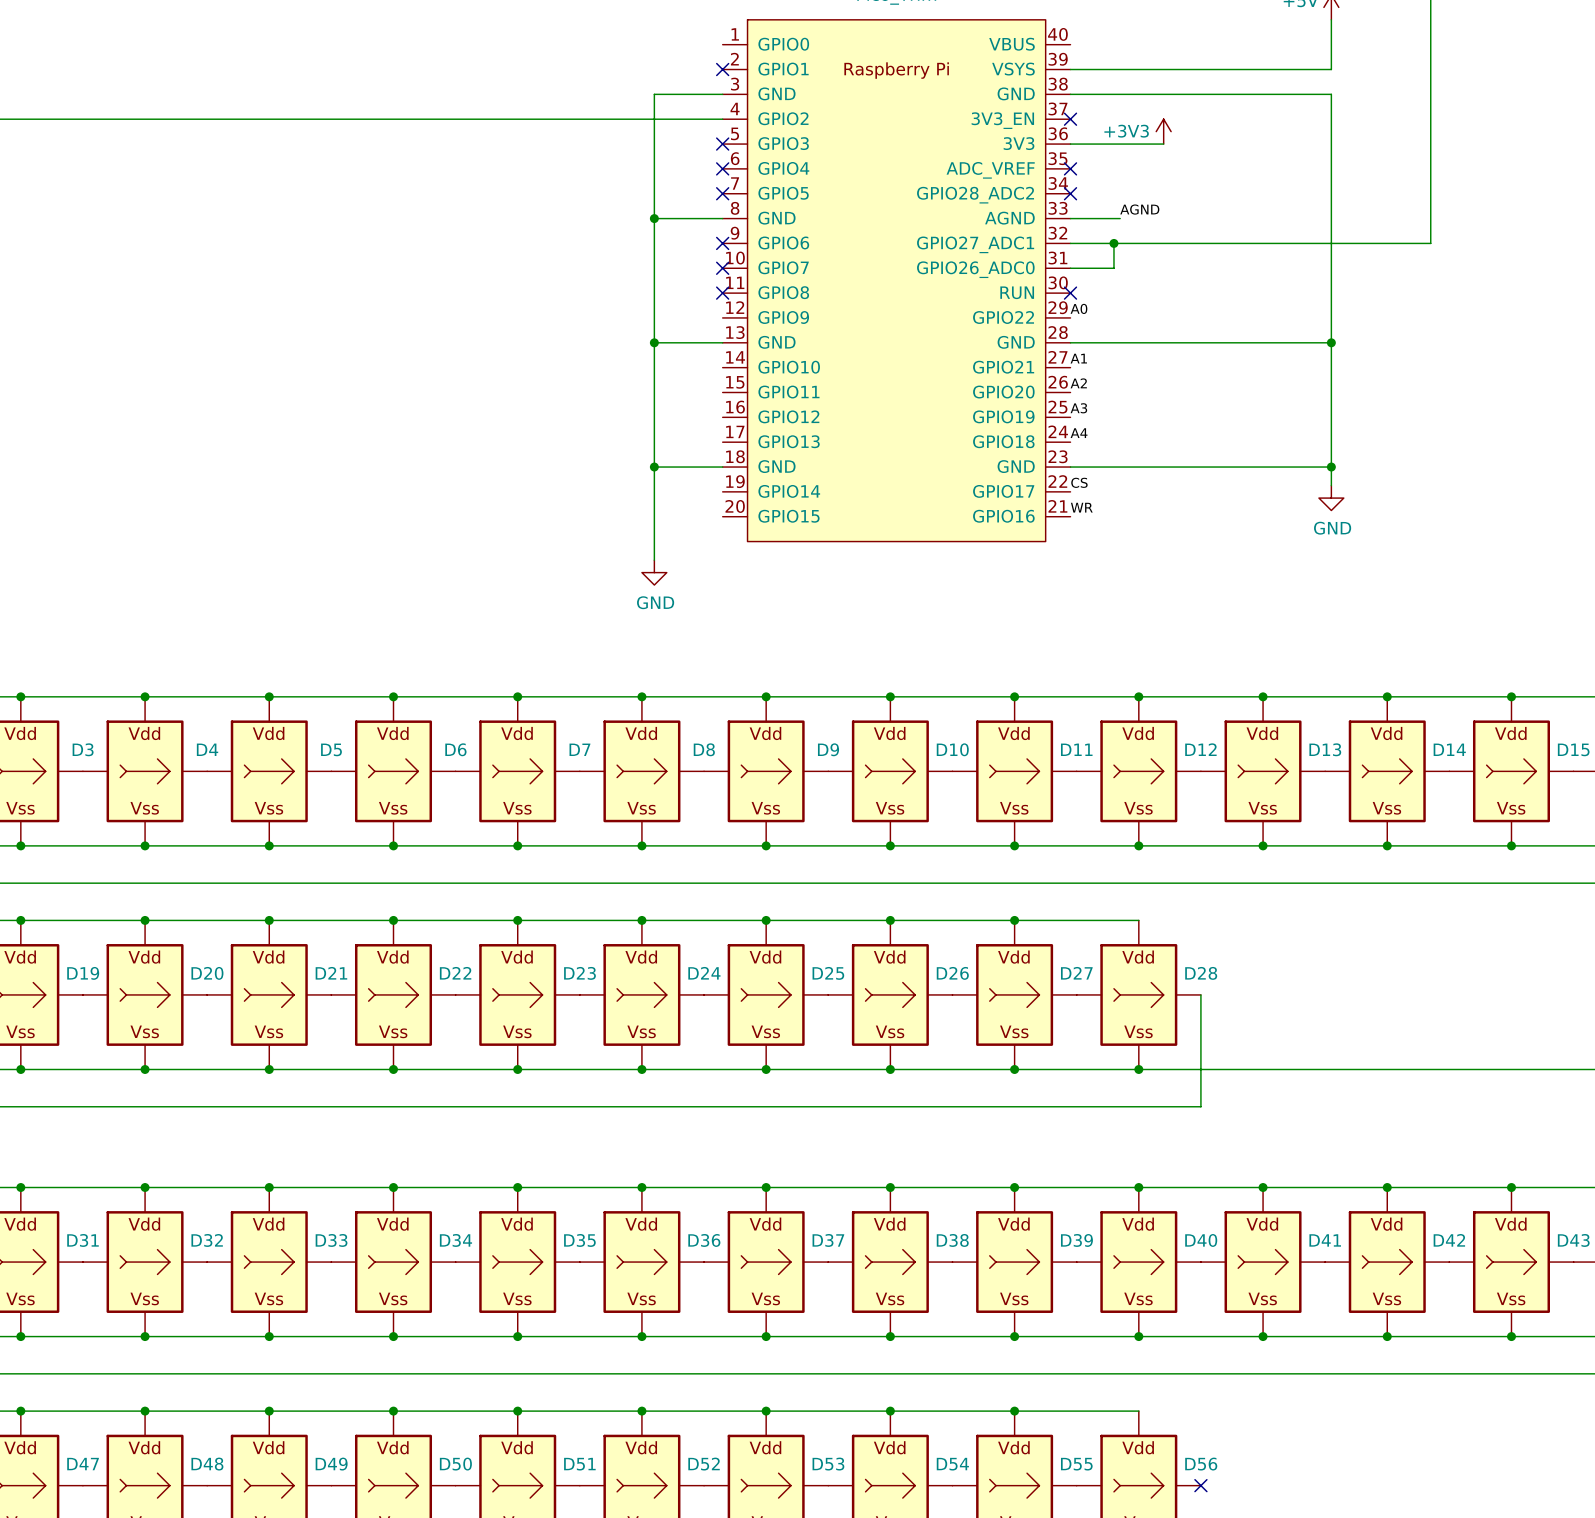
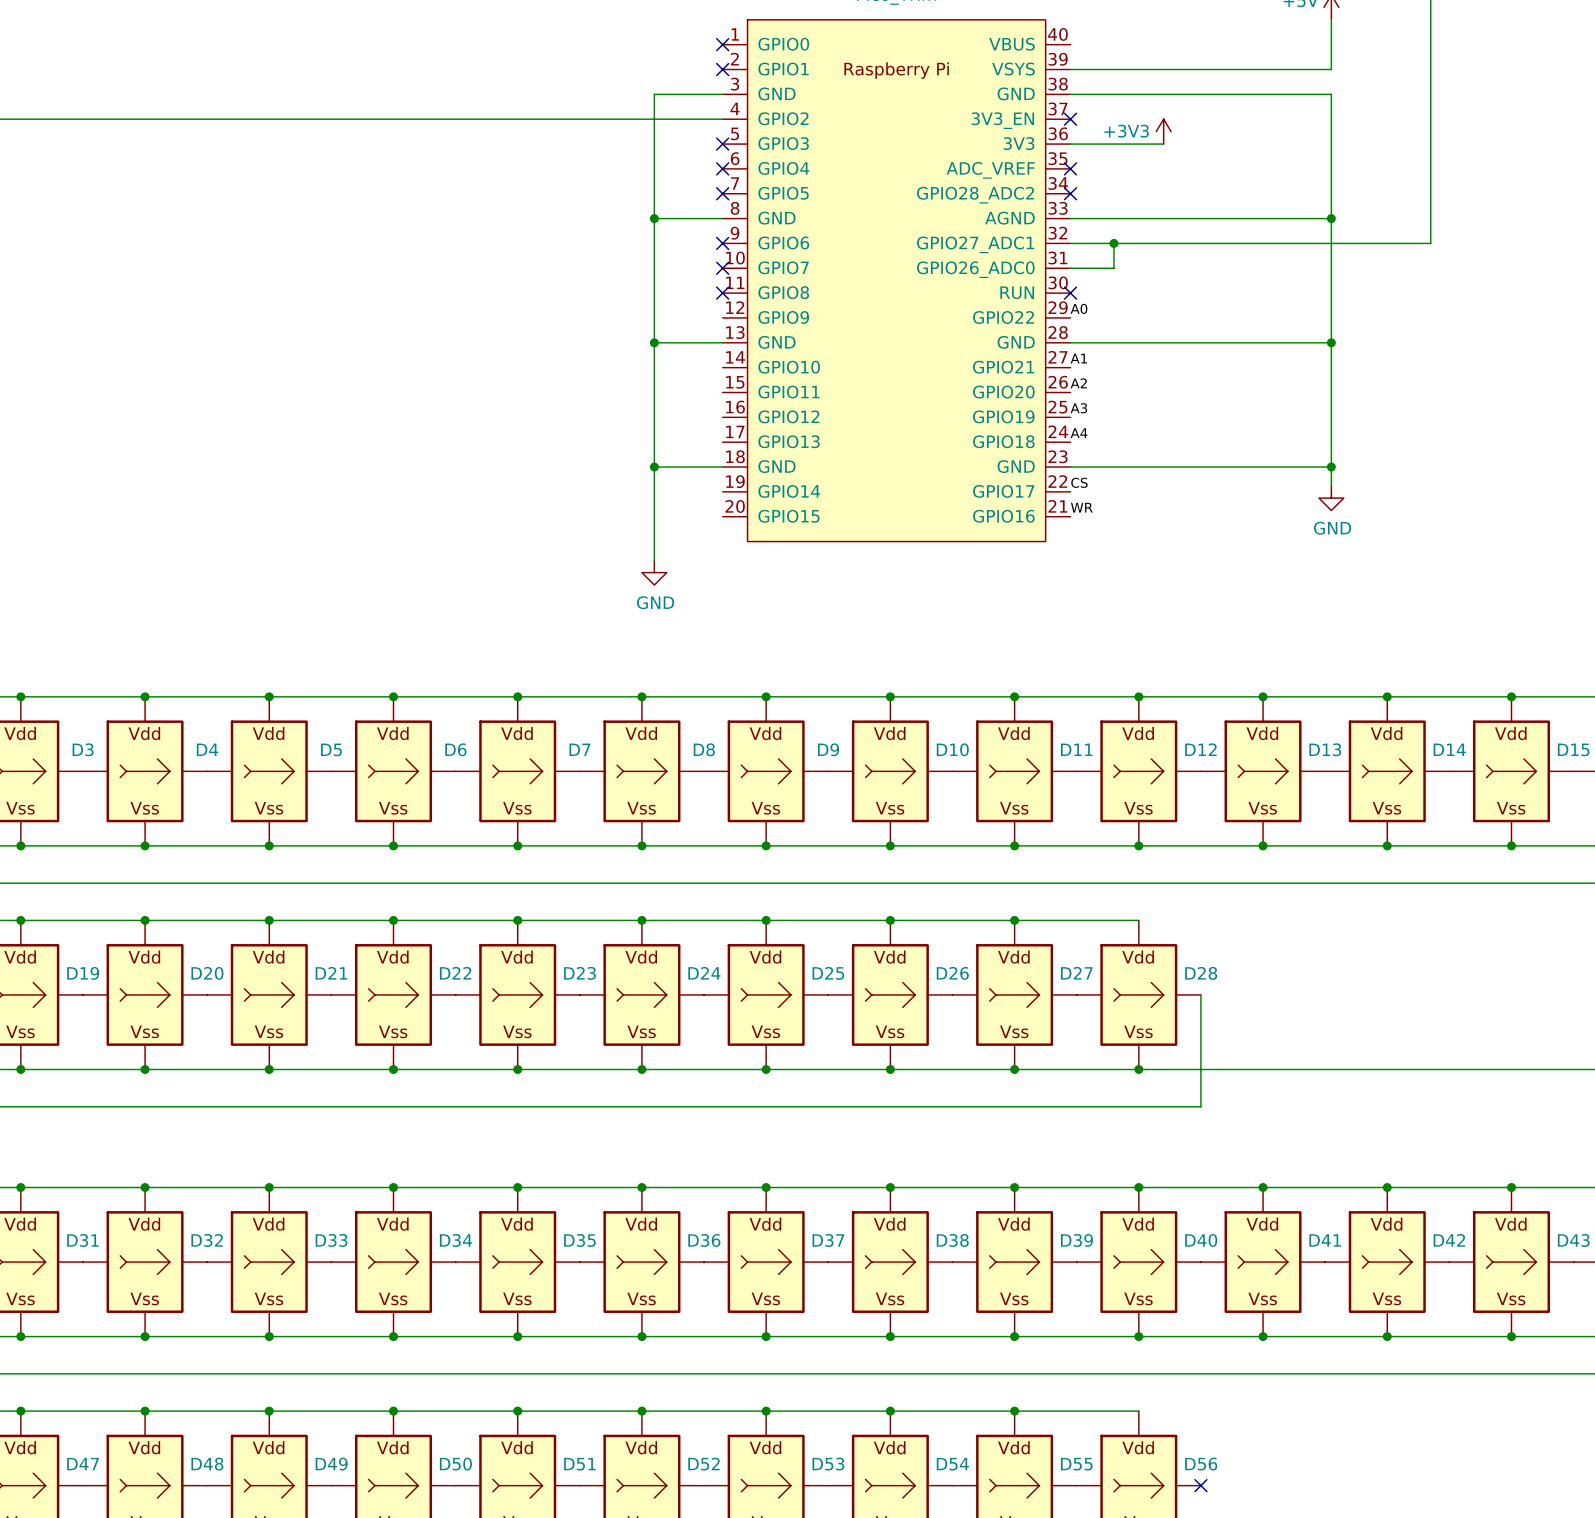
no-connect mark: none -> (722, 44)
label: AGND (1139, 209) -> none
wire: none -> (1120, 218) (1331, 218)
junction: none -> (1331, 218)

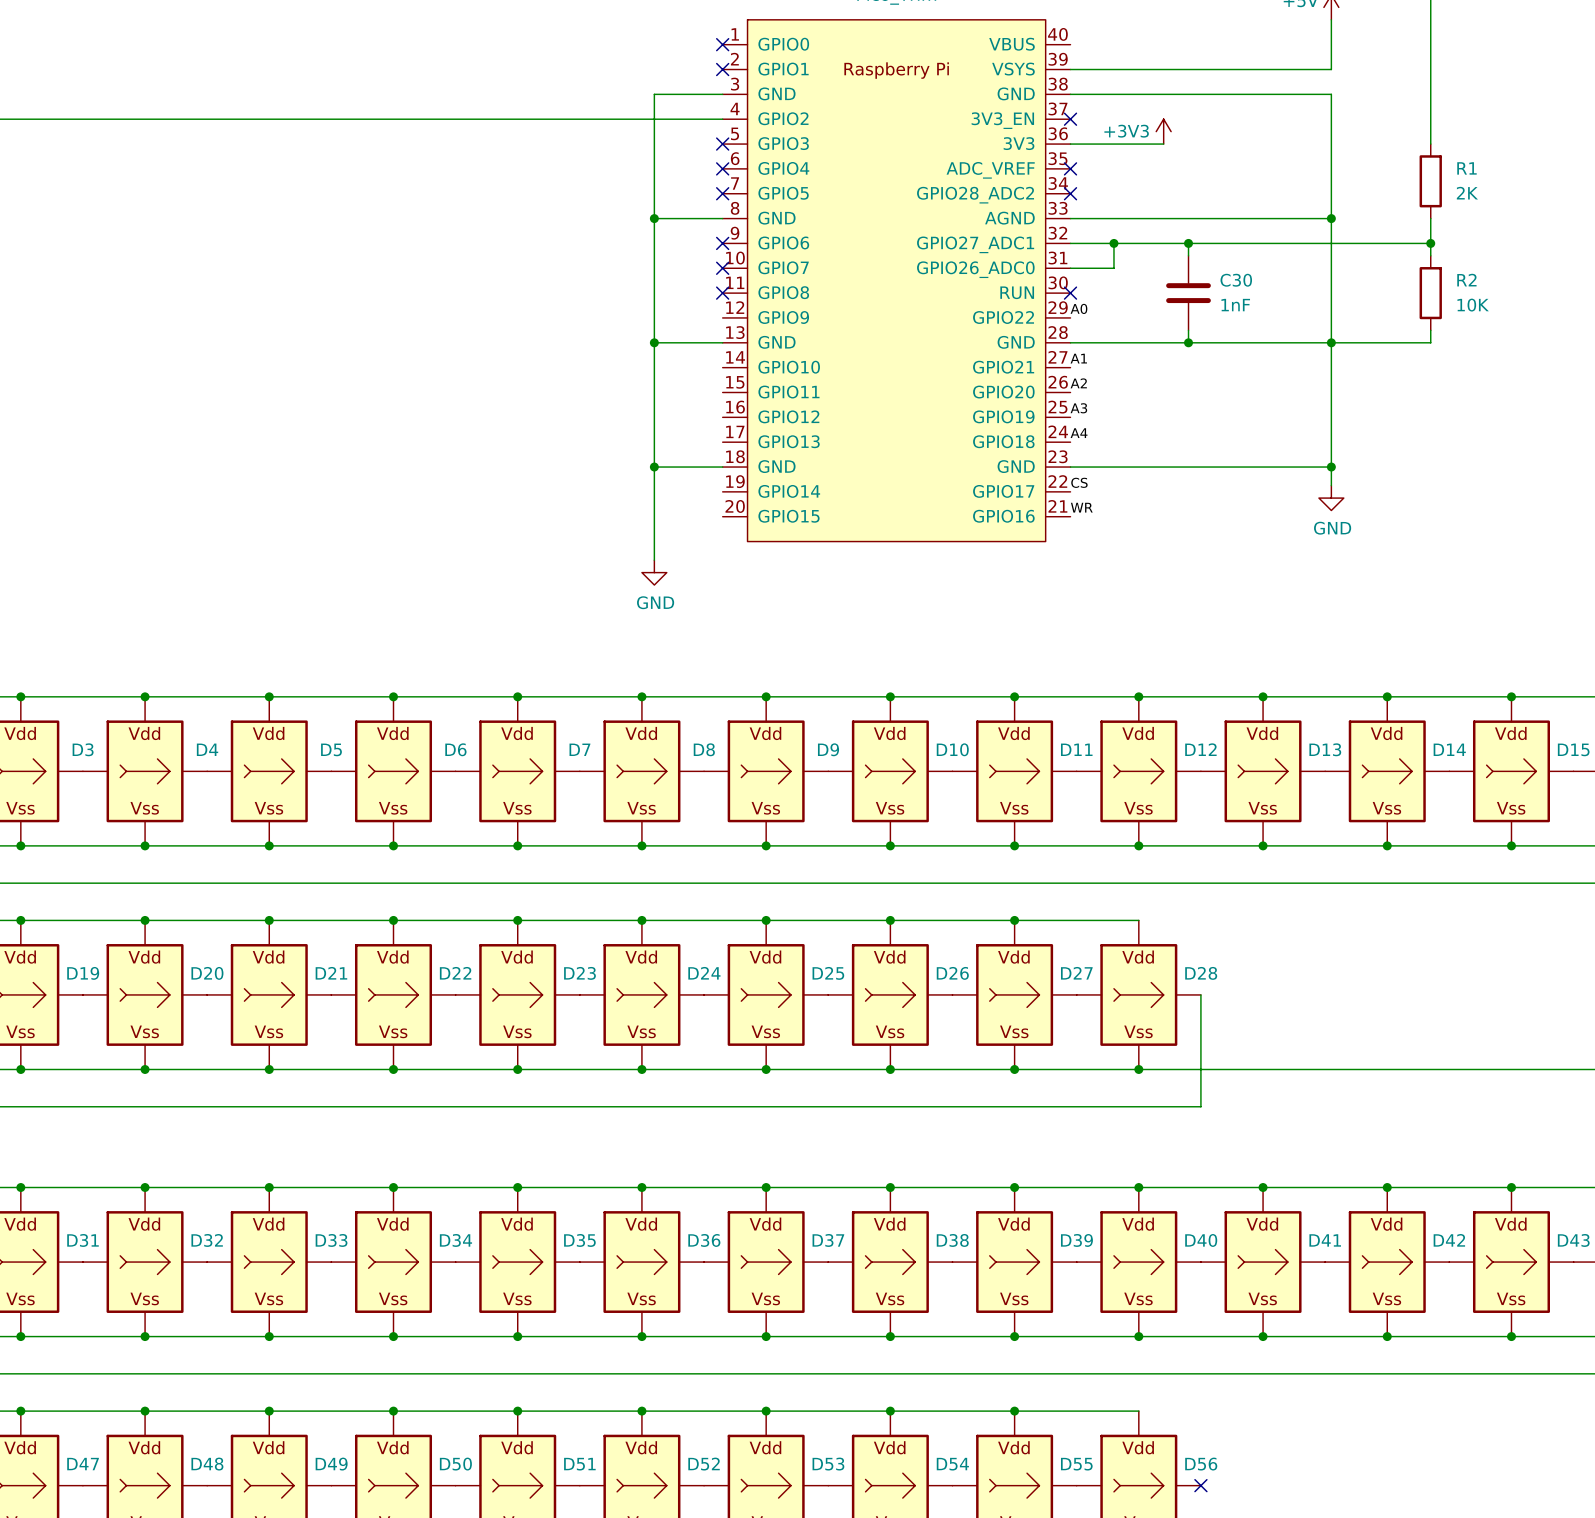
wire: (1430, 144) (1430, 218) -> none
R1: none -> 2K (1430, 181)
wire: none -> (1188, 243) (1188, 255)
junction: none -> (1188, 243)
wire: none -> (1430, 243) (1430, 255)
junction: none -> (1430, 243)
C30: none -> 1nF (1188, 293)
R2: none -> 10K (1430, 293)
wire: none -> (1188, 330) (1188, 342)
wire: none -> (1430, 330) (1430, 342) (1331, 342)
junction: none -> (1188, 342)

